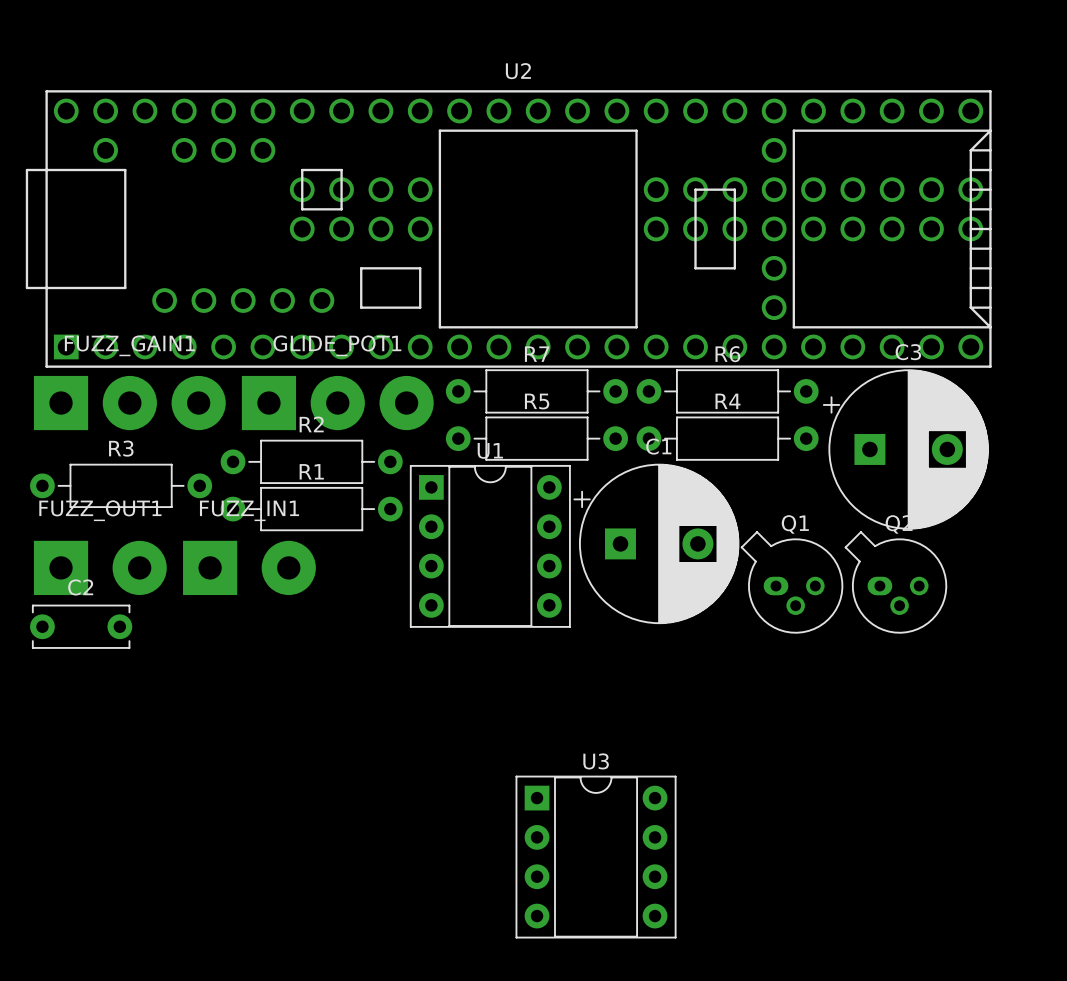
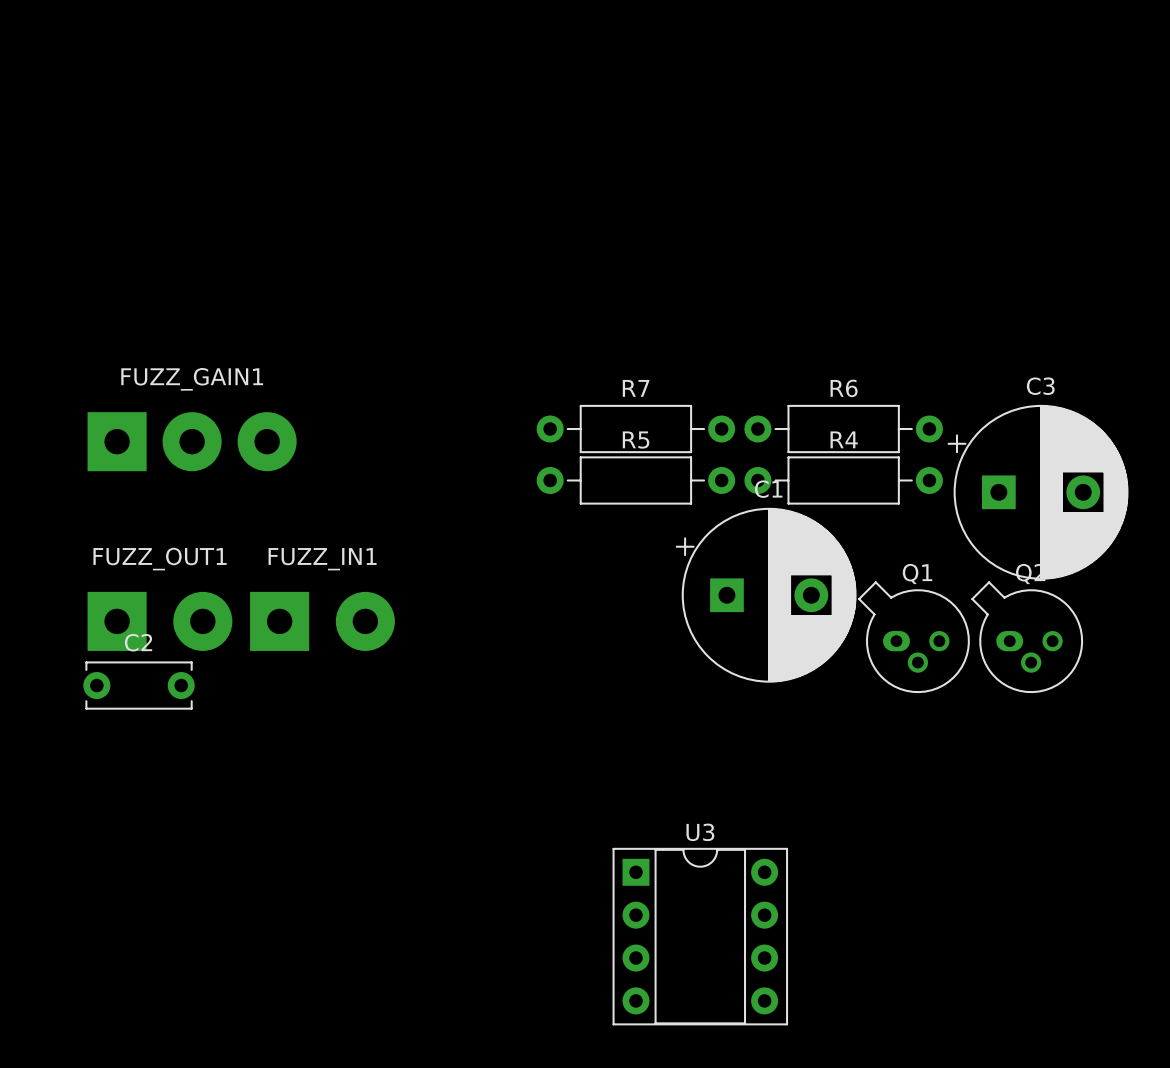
U2: (508, 228) -> none
GLIDE_POT1: (337, 403) -> none
R2: (311, 461) -> none
R3: (121, 485) -> none
R1: (311, 509) -> none
U1: (490, 546) -> none

